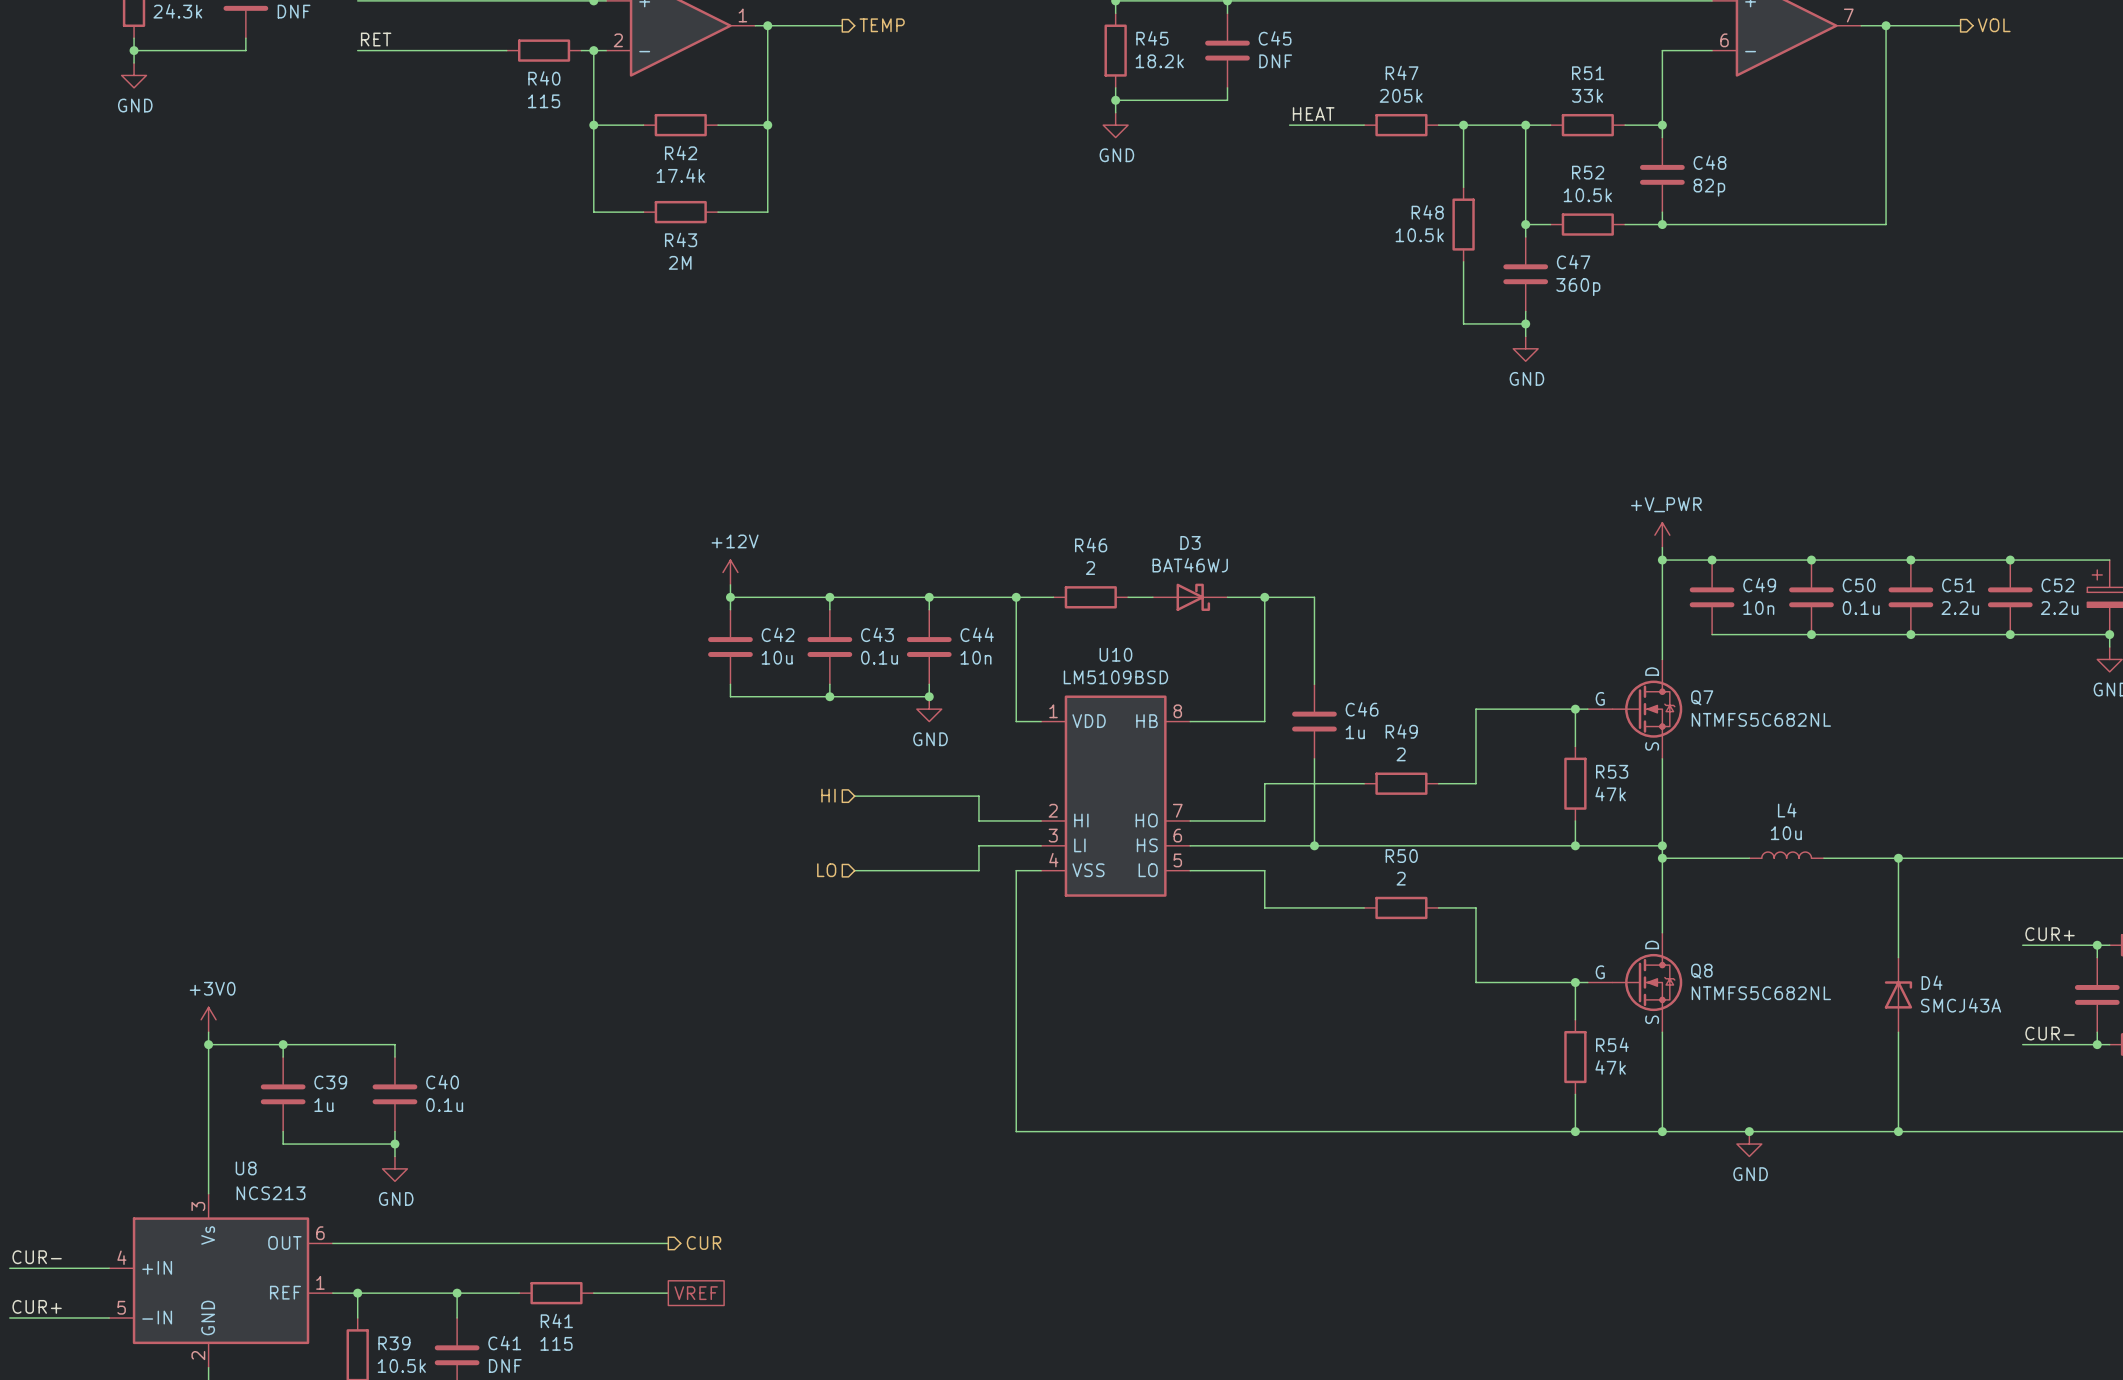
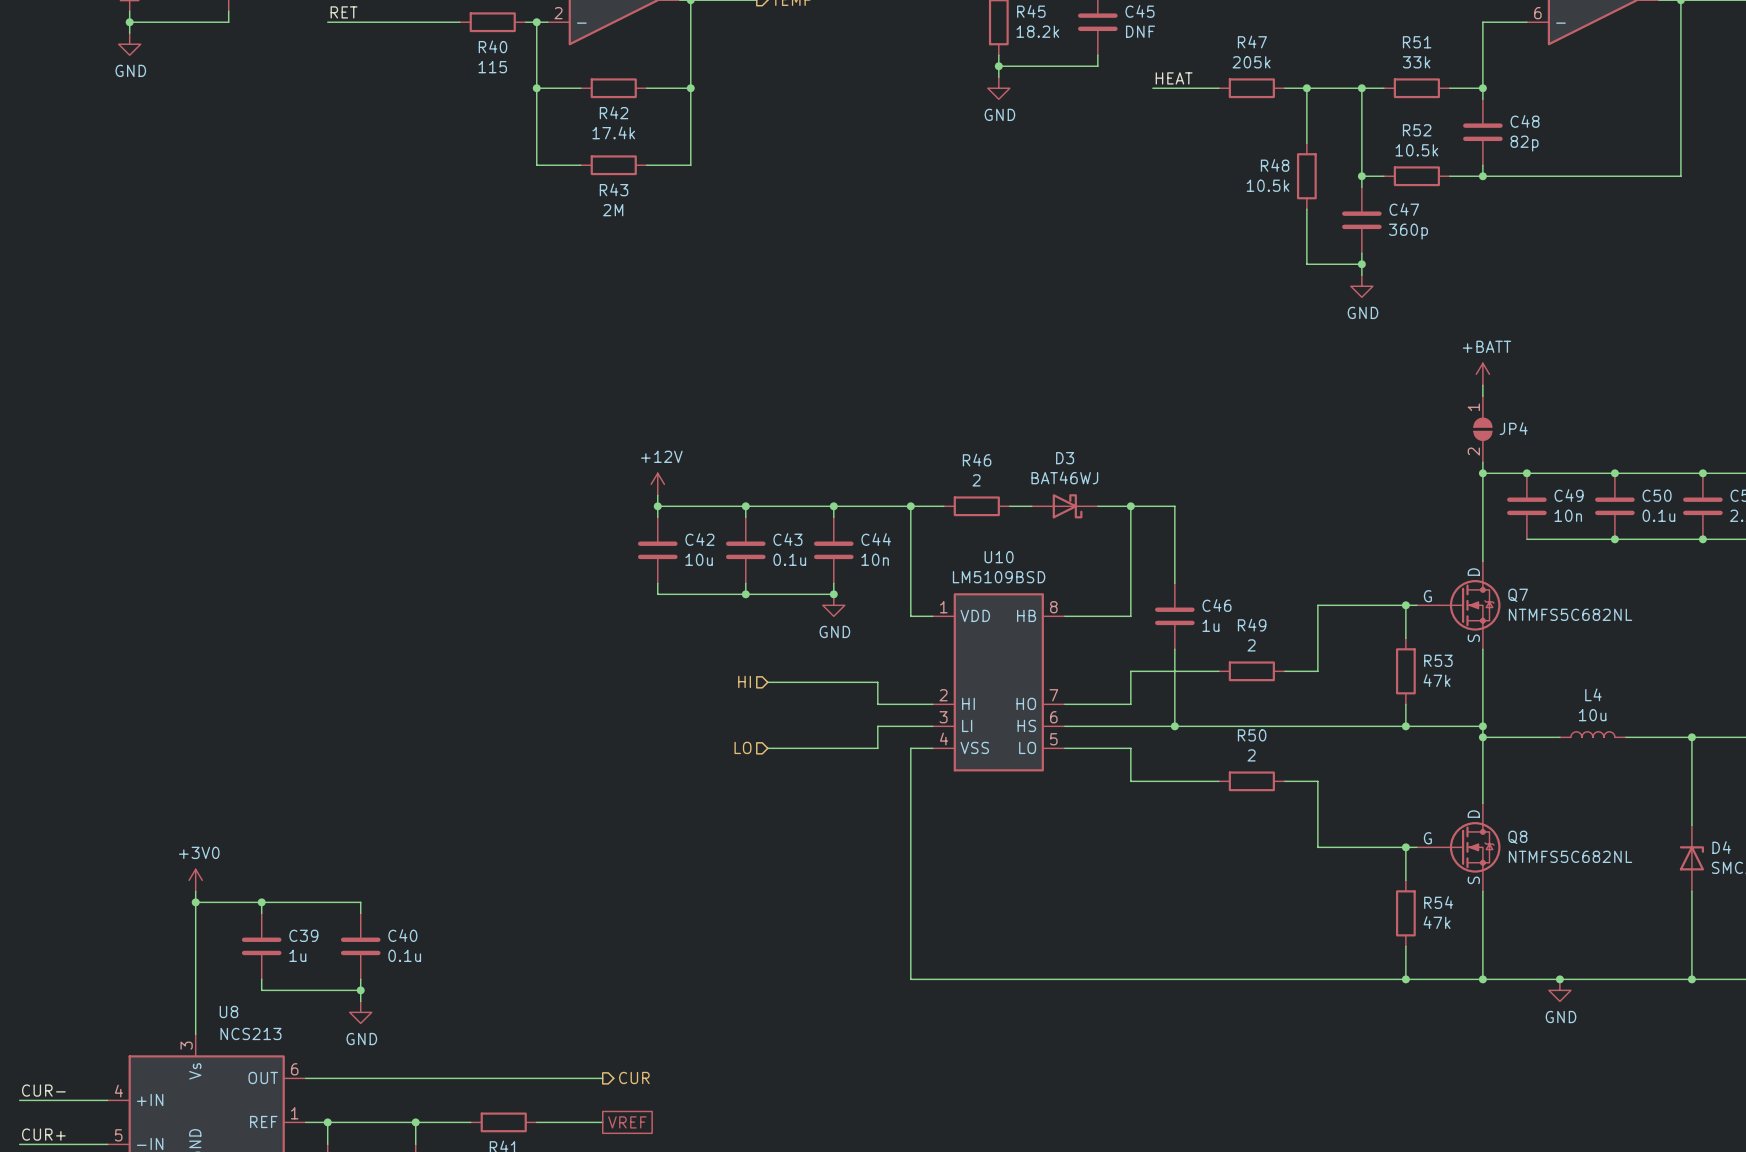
power symbol: none -> +BATT (1482, 374)
wire: none -> (1482, 385) (1482, 396)
JP4: none -> (1482, 429)
power symbol: +V_PWR (1662, 535) -> none

